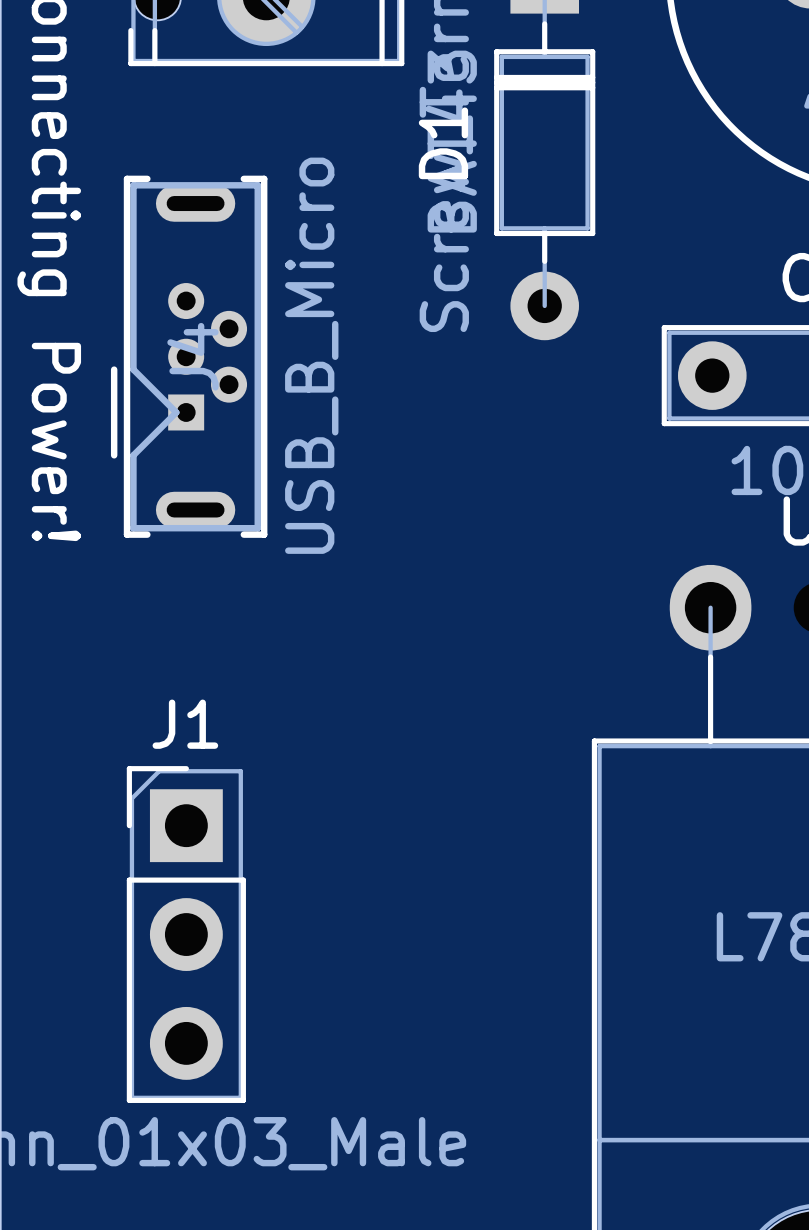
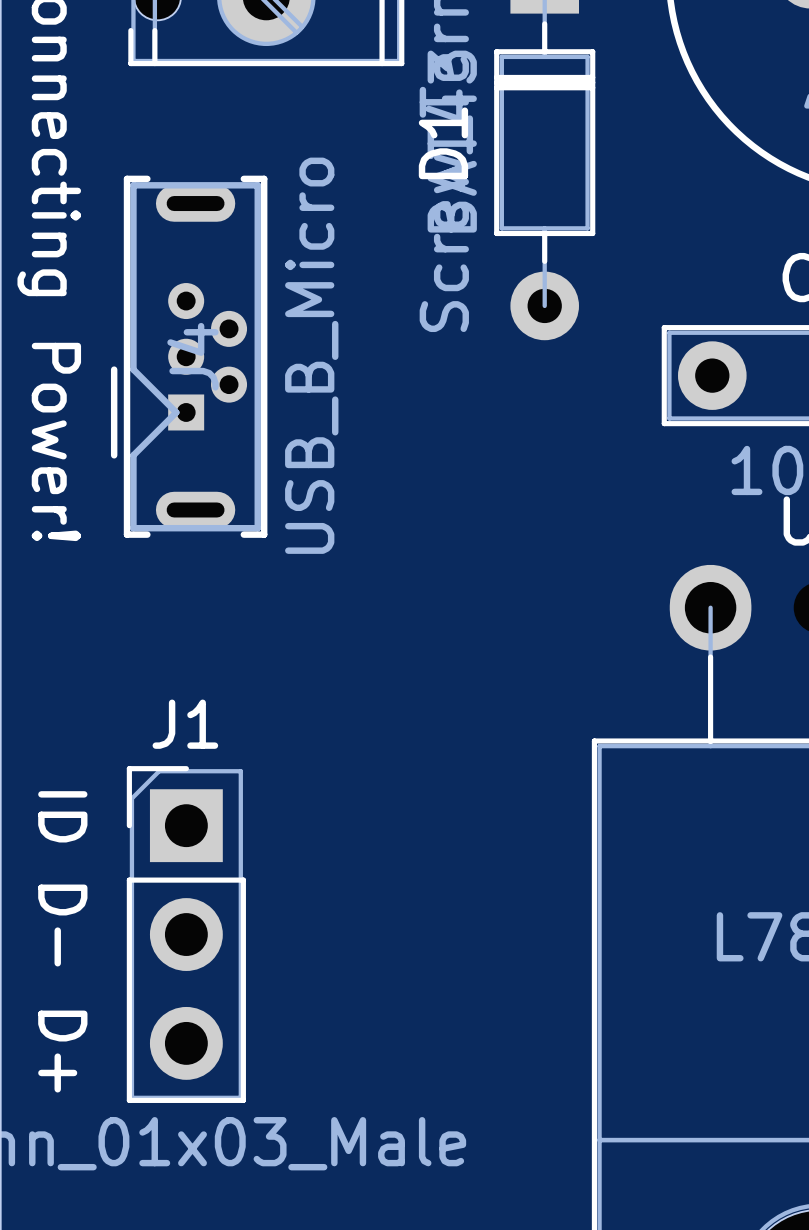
text: none -> ID (62, 816)
text: none -> D- (62, 925)
text: none -> D+ (62, 1051)

